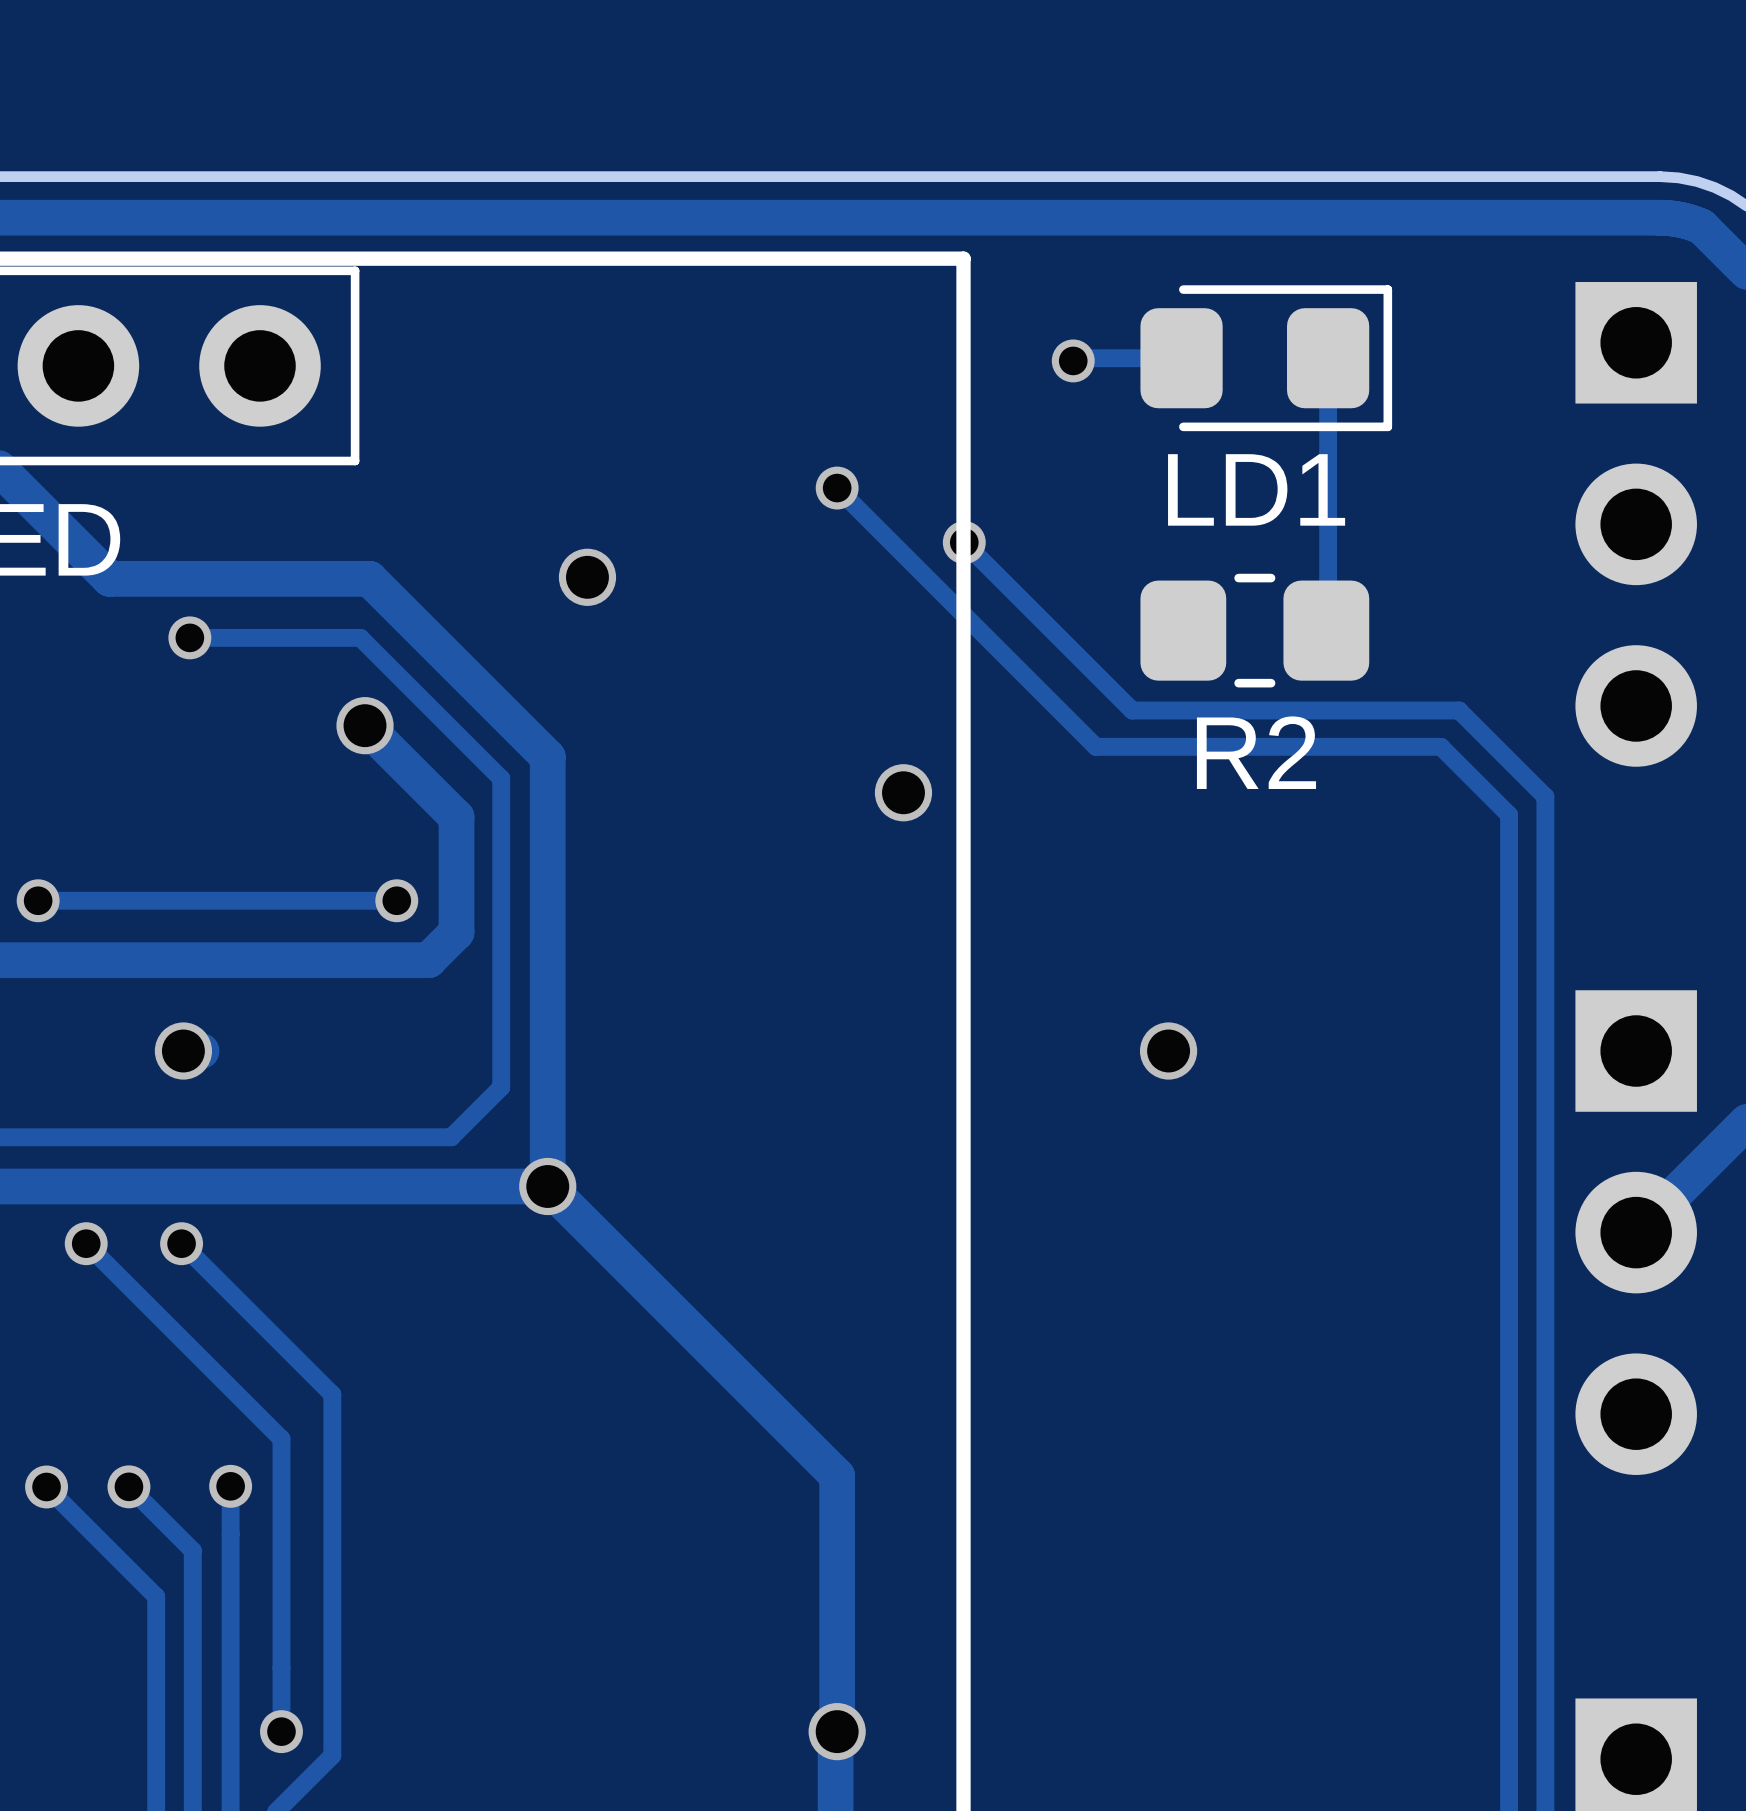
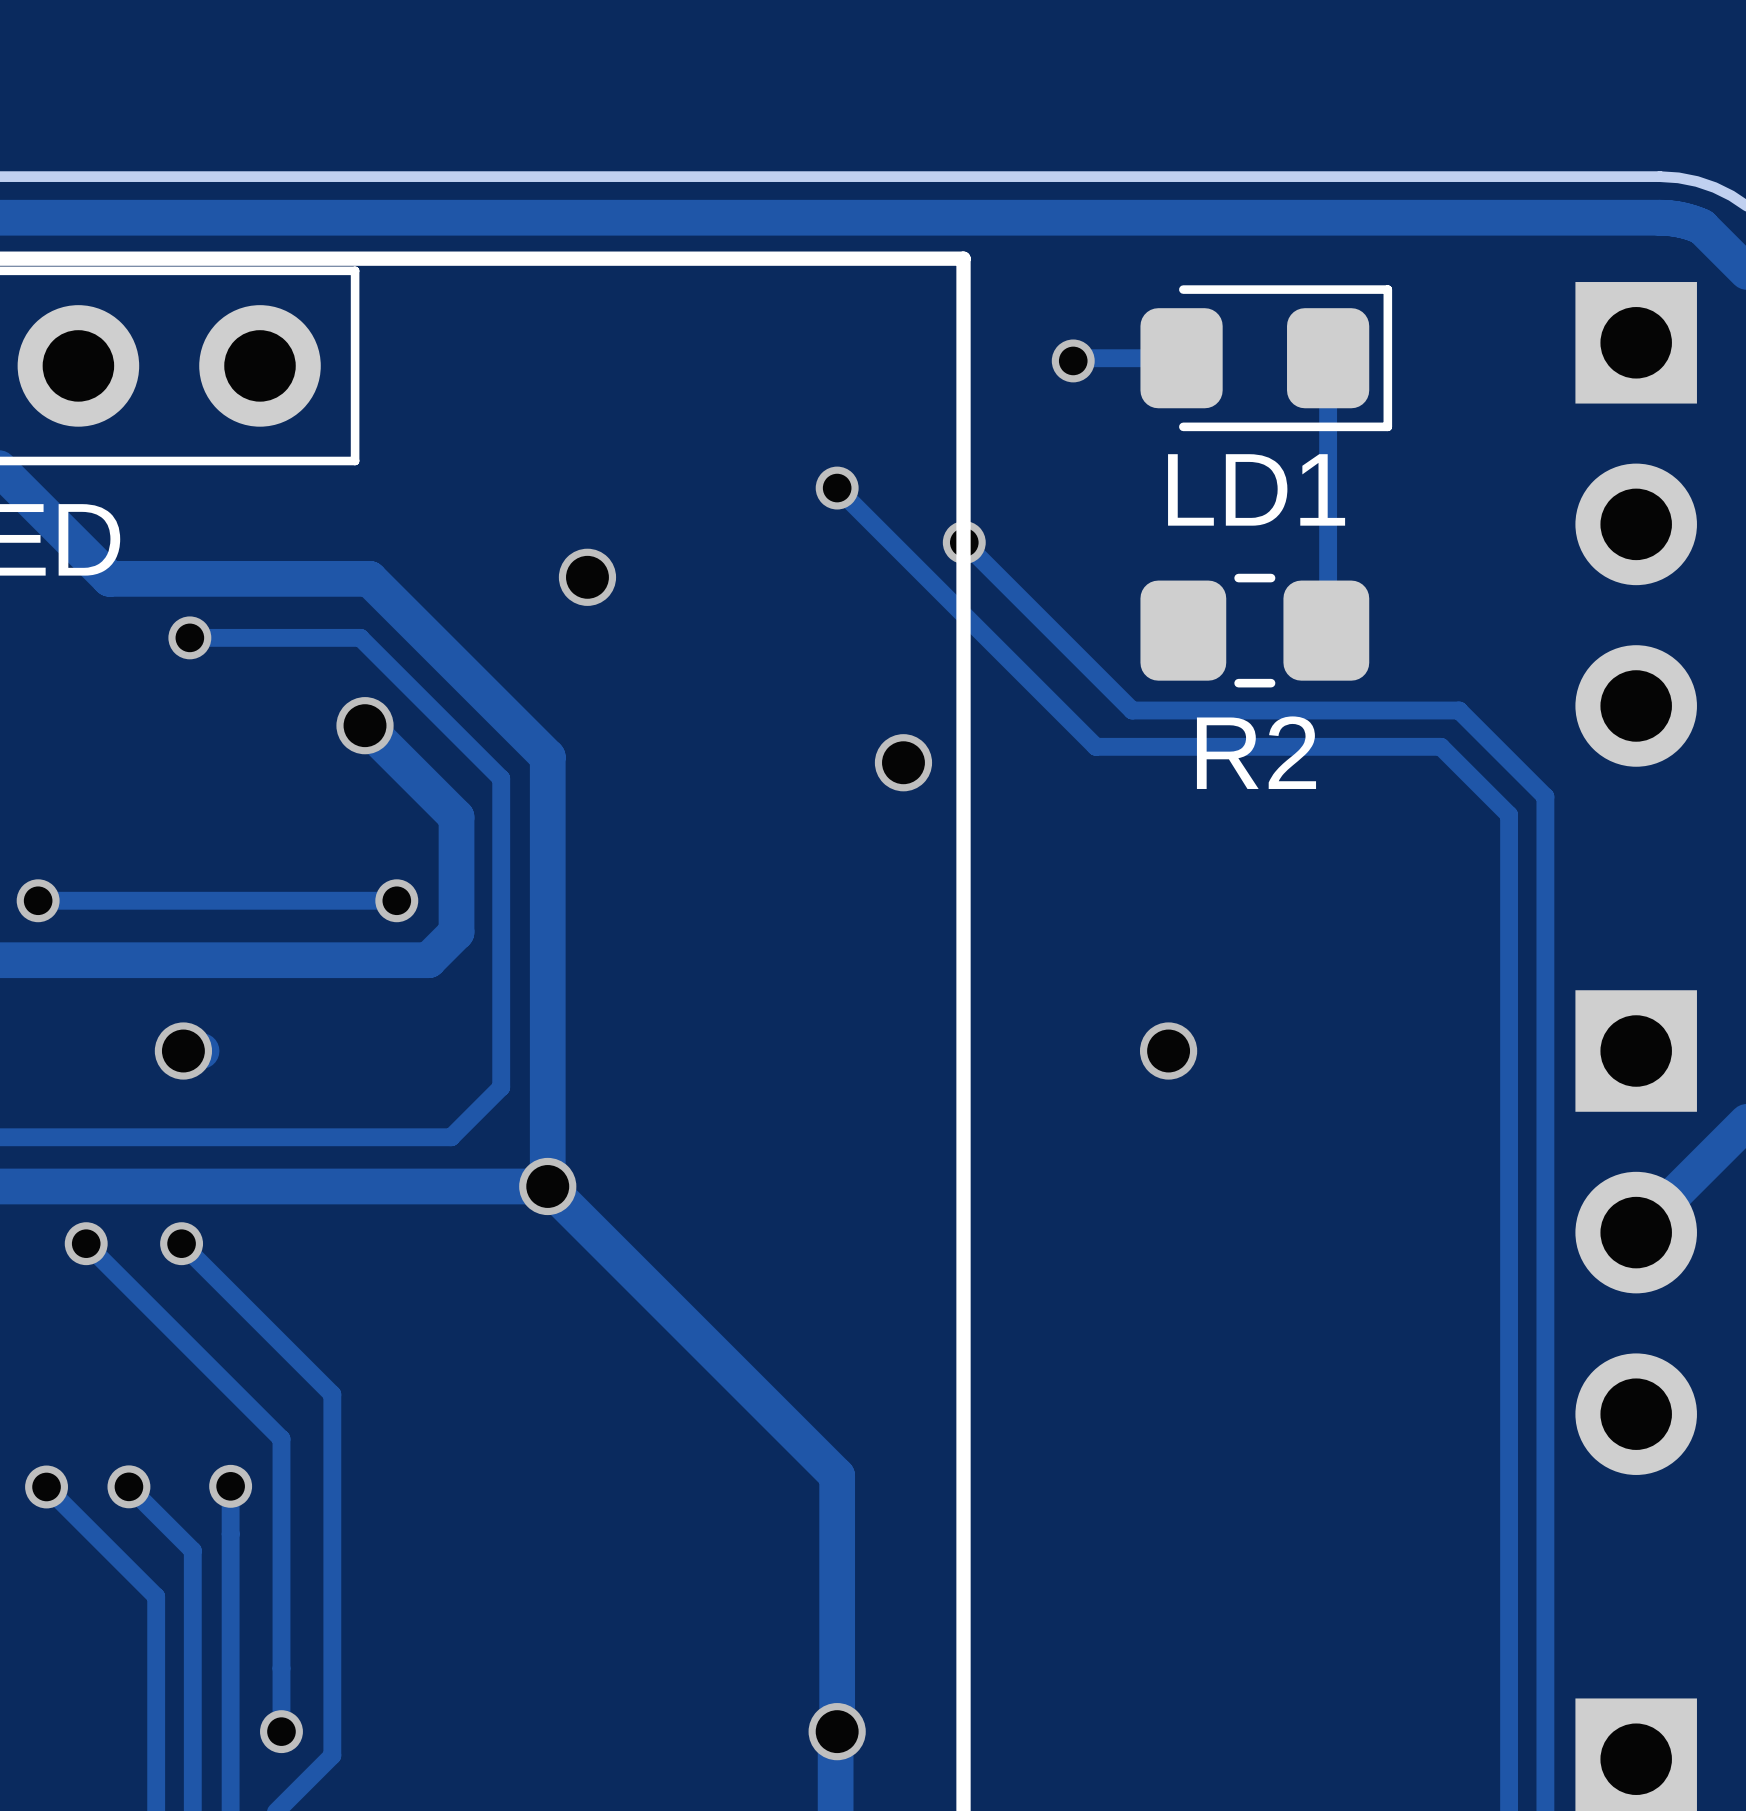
via position: (903, 792) -> (903, 762)

